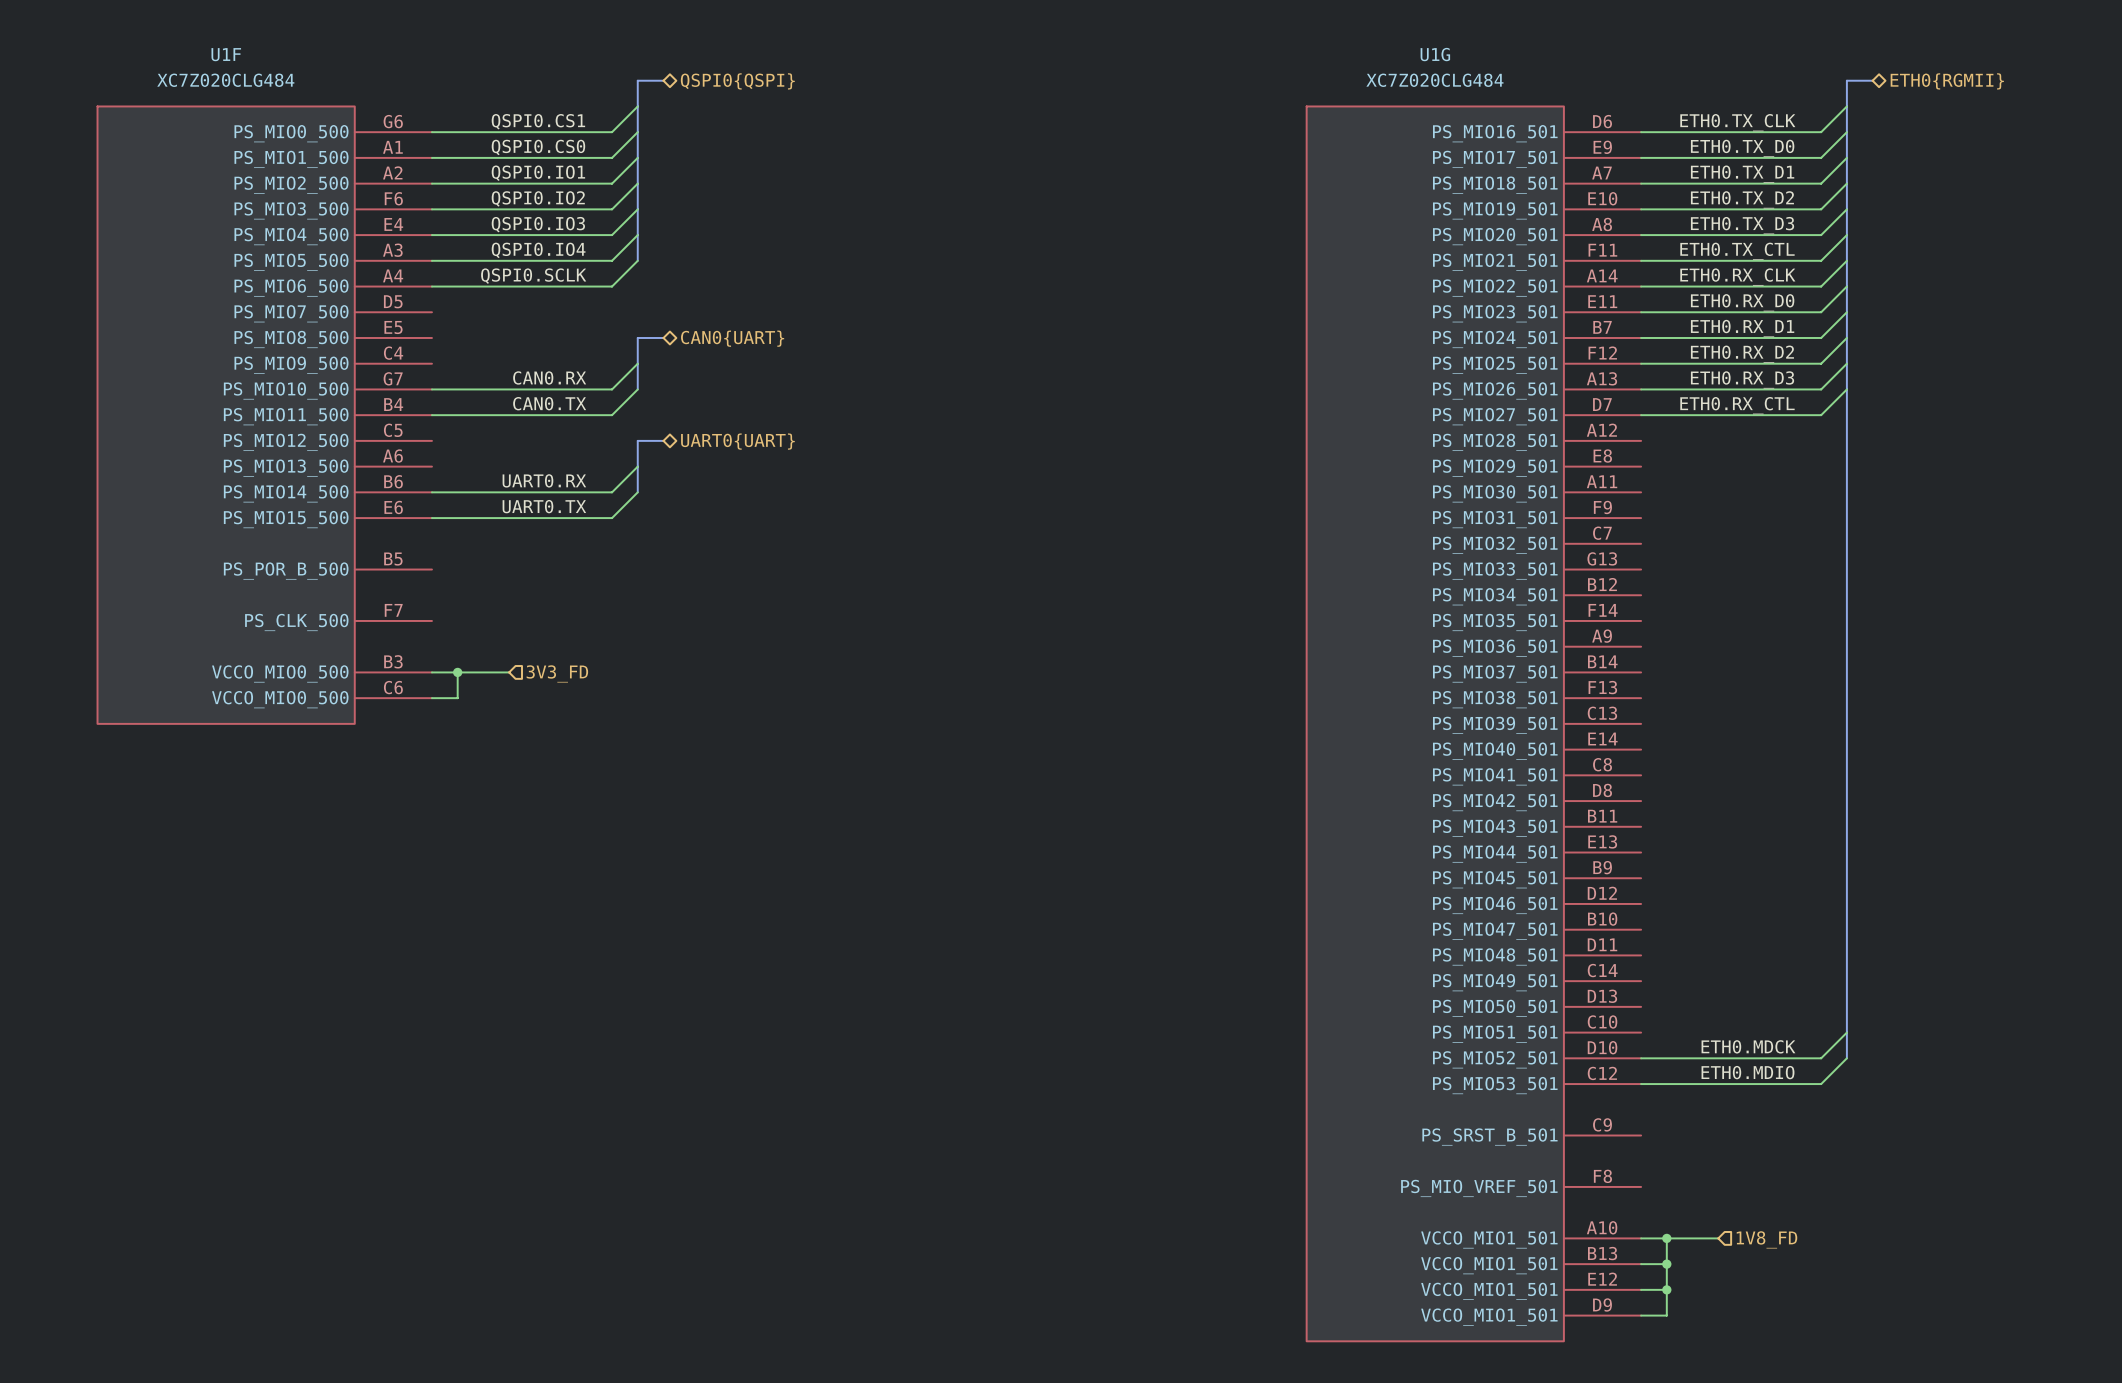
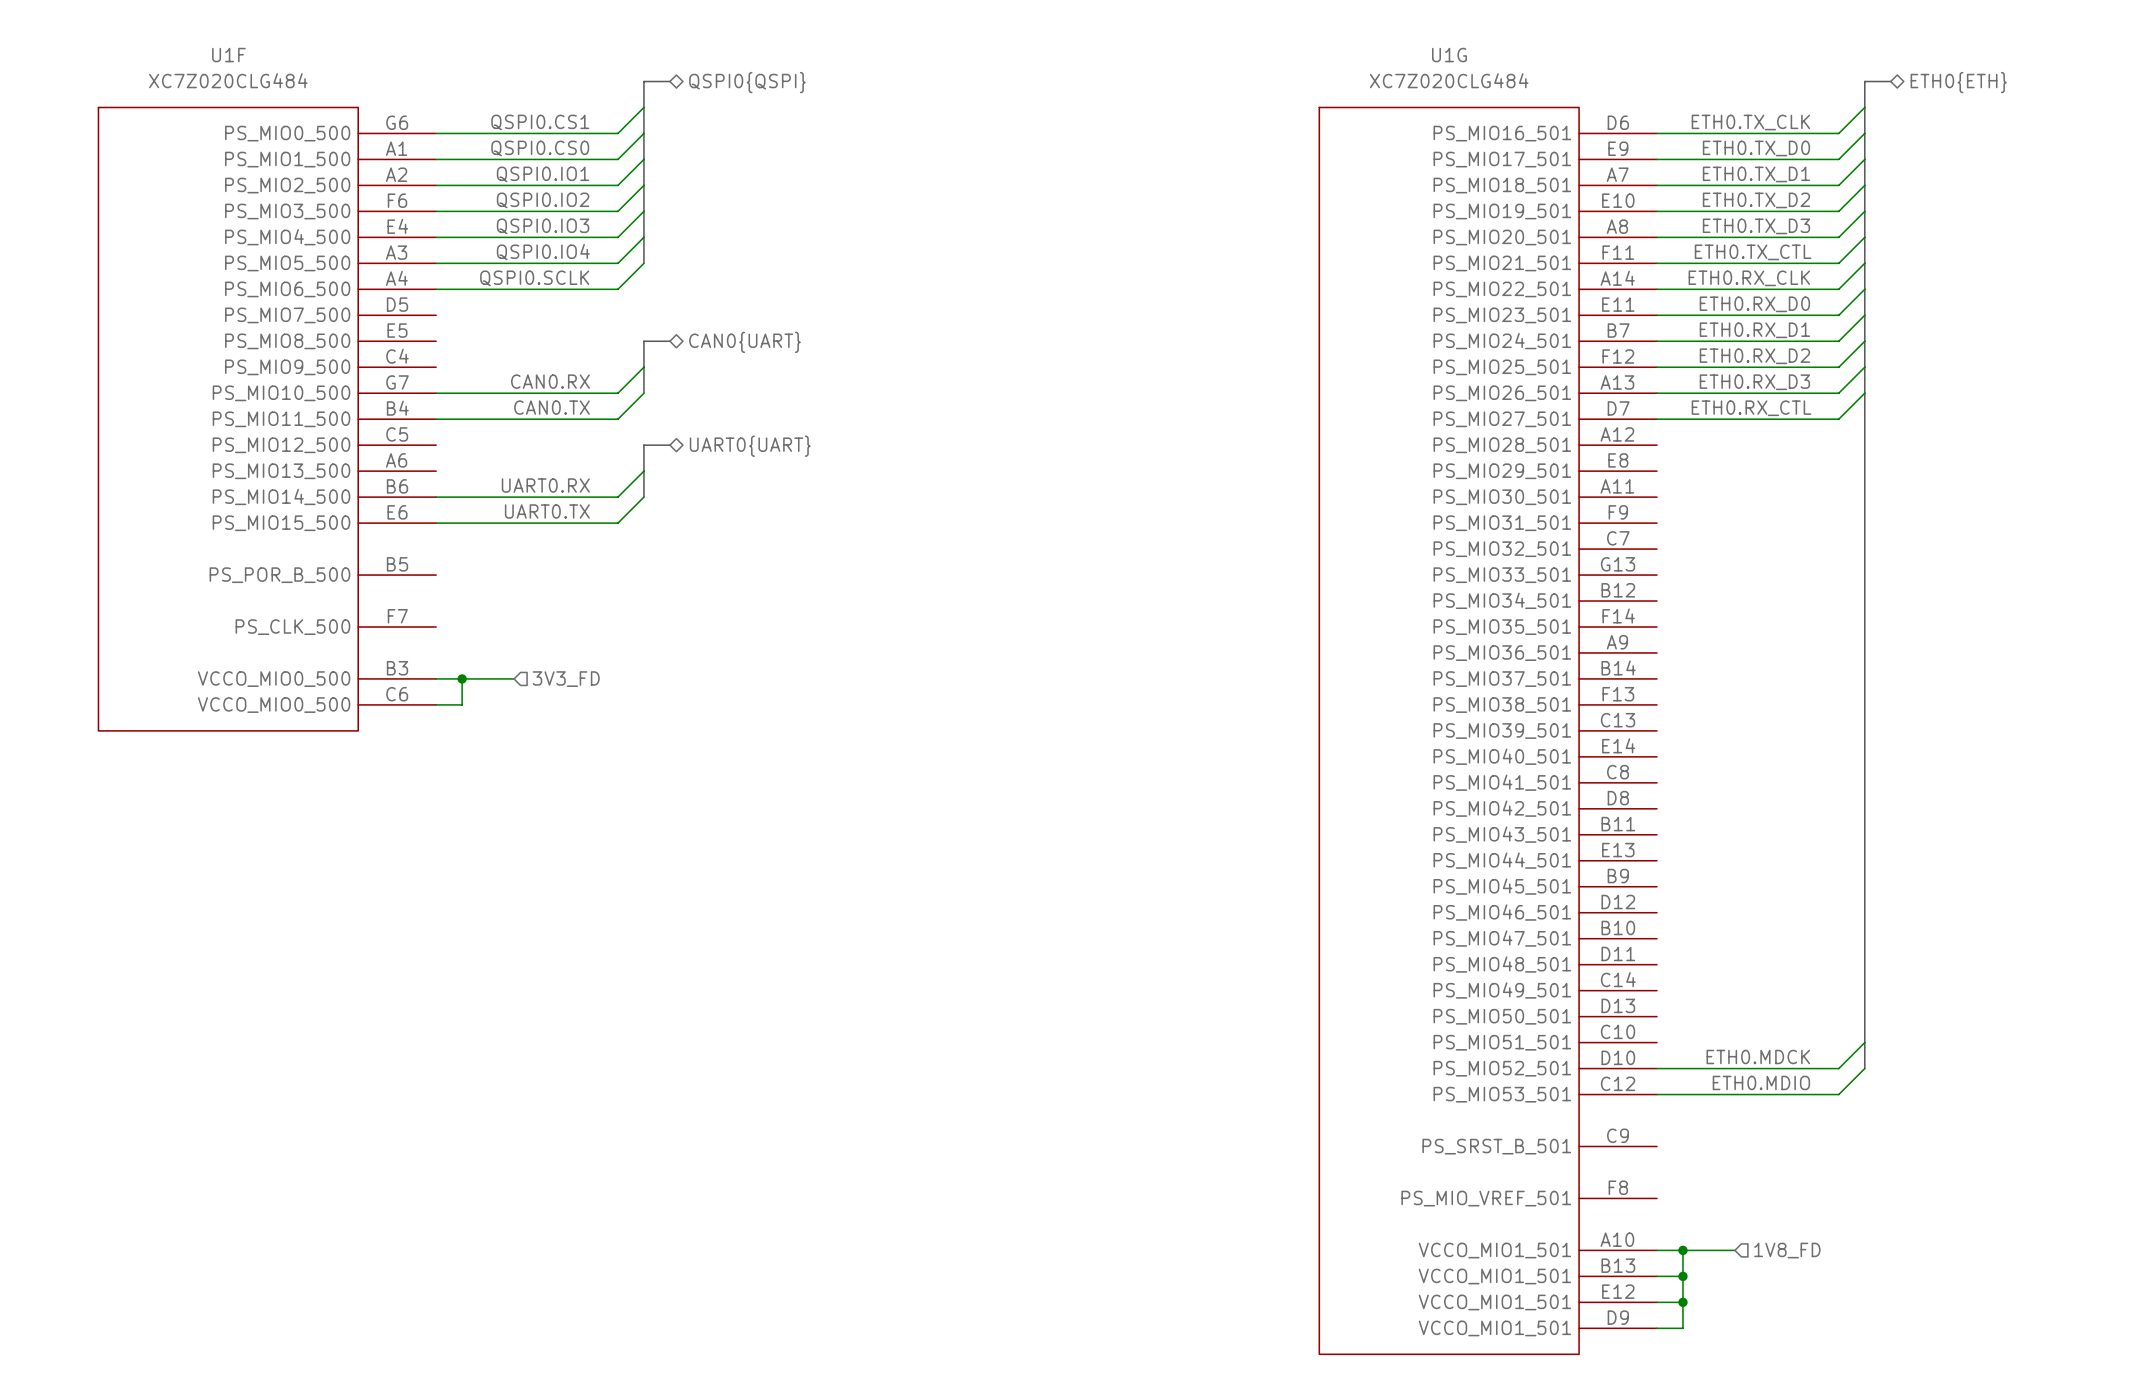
hierarchical label: ETH0{RGMII} (1947, 81) -> ETH0{ETH} (1958, 82)

